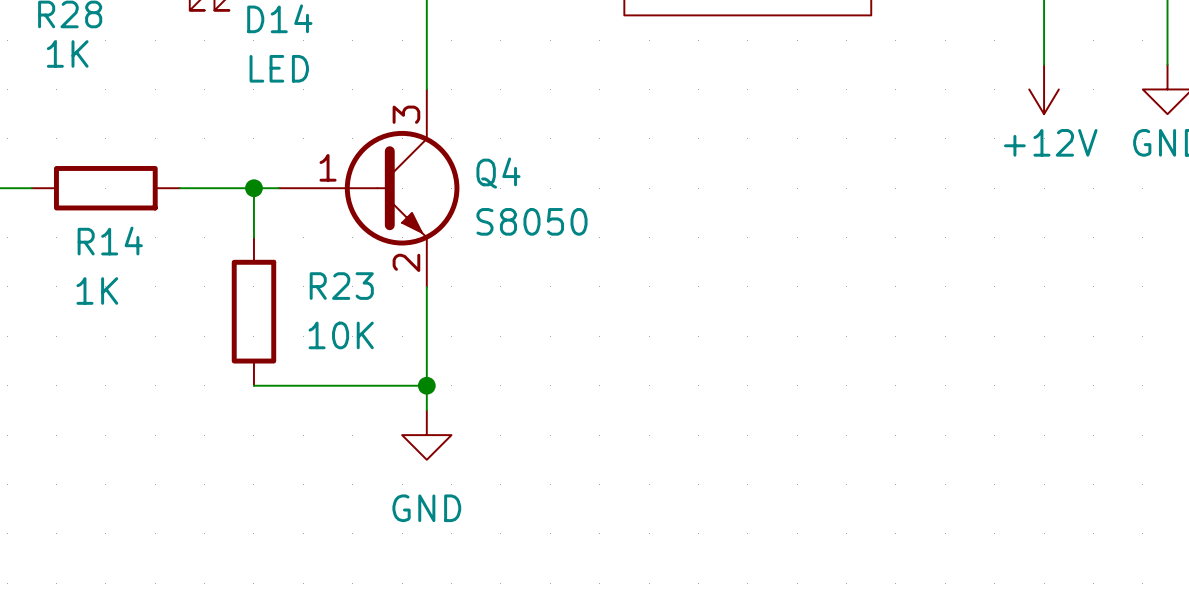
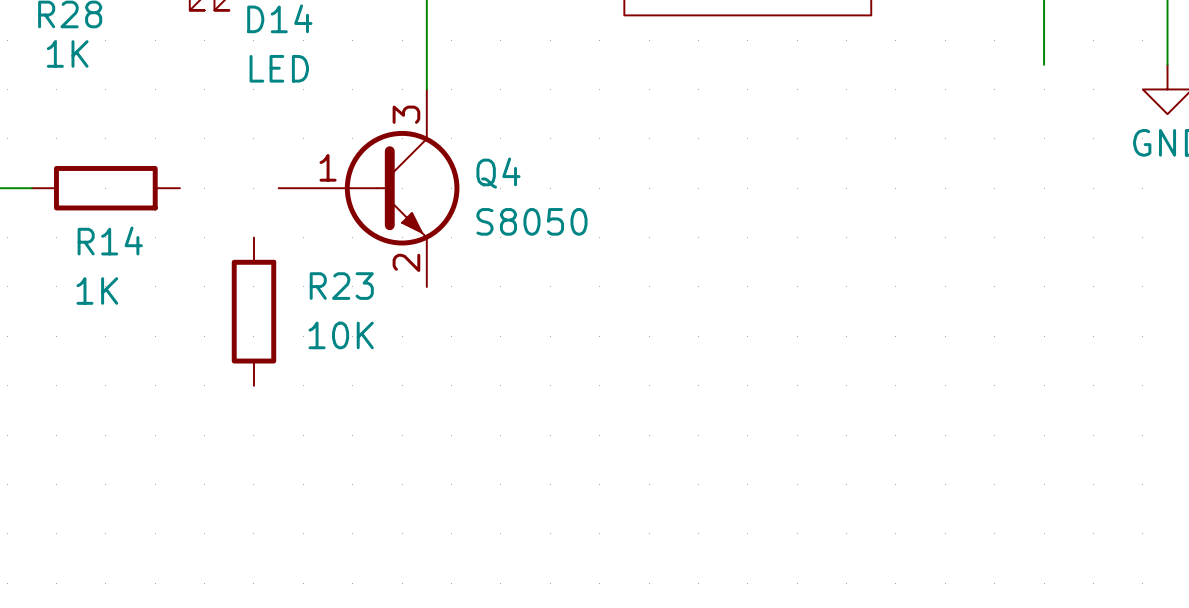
power symbol: +12V (1044, 89) -> none
wire: (179, 188) (278, 188) -> none
wire: (253, 188) (253, 237) -> none
junction: (253, 188) -> none
wire: (426, 286) (426, 410) -> none
wire: (253, 385) (426, 385) -> none
junction: (426, 385) -> none
power symbol: GND (426, 435) -> none

